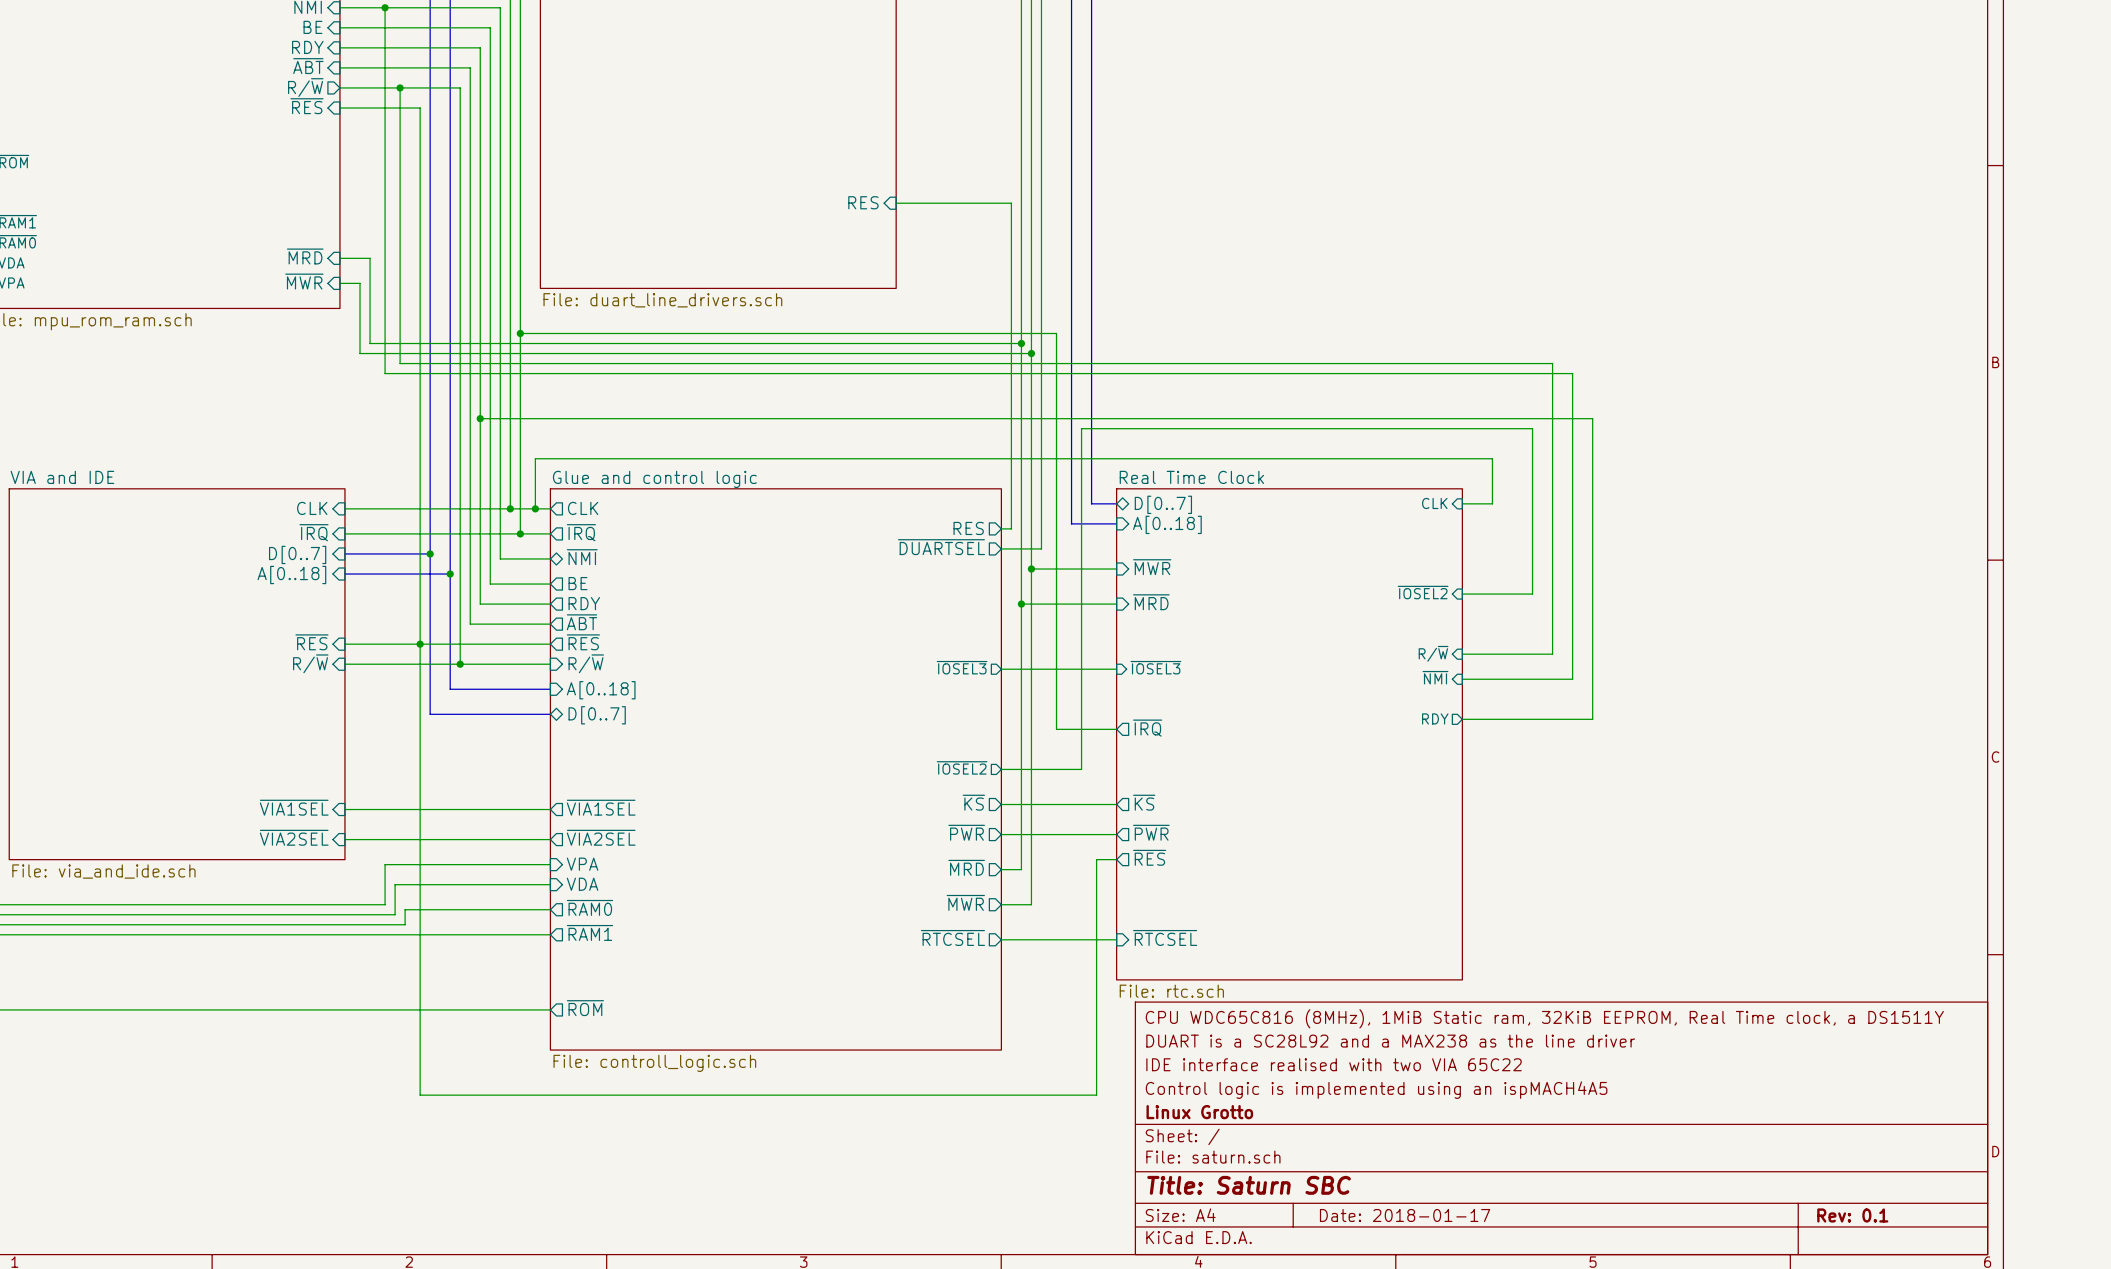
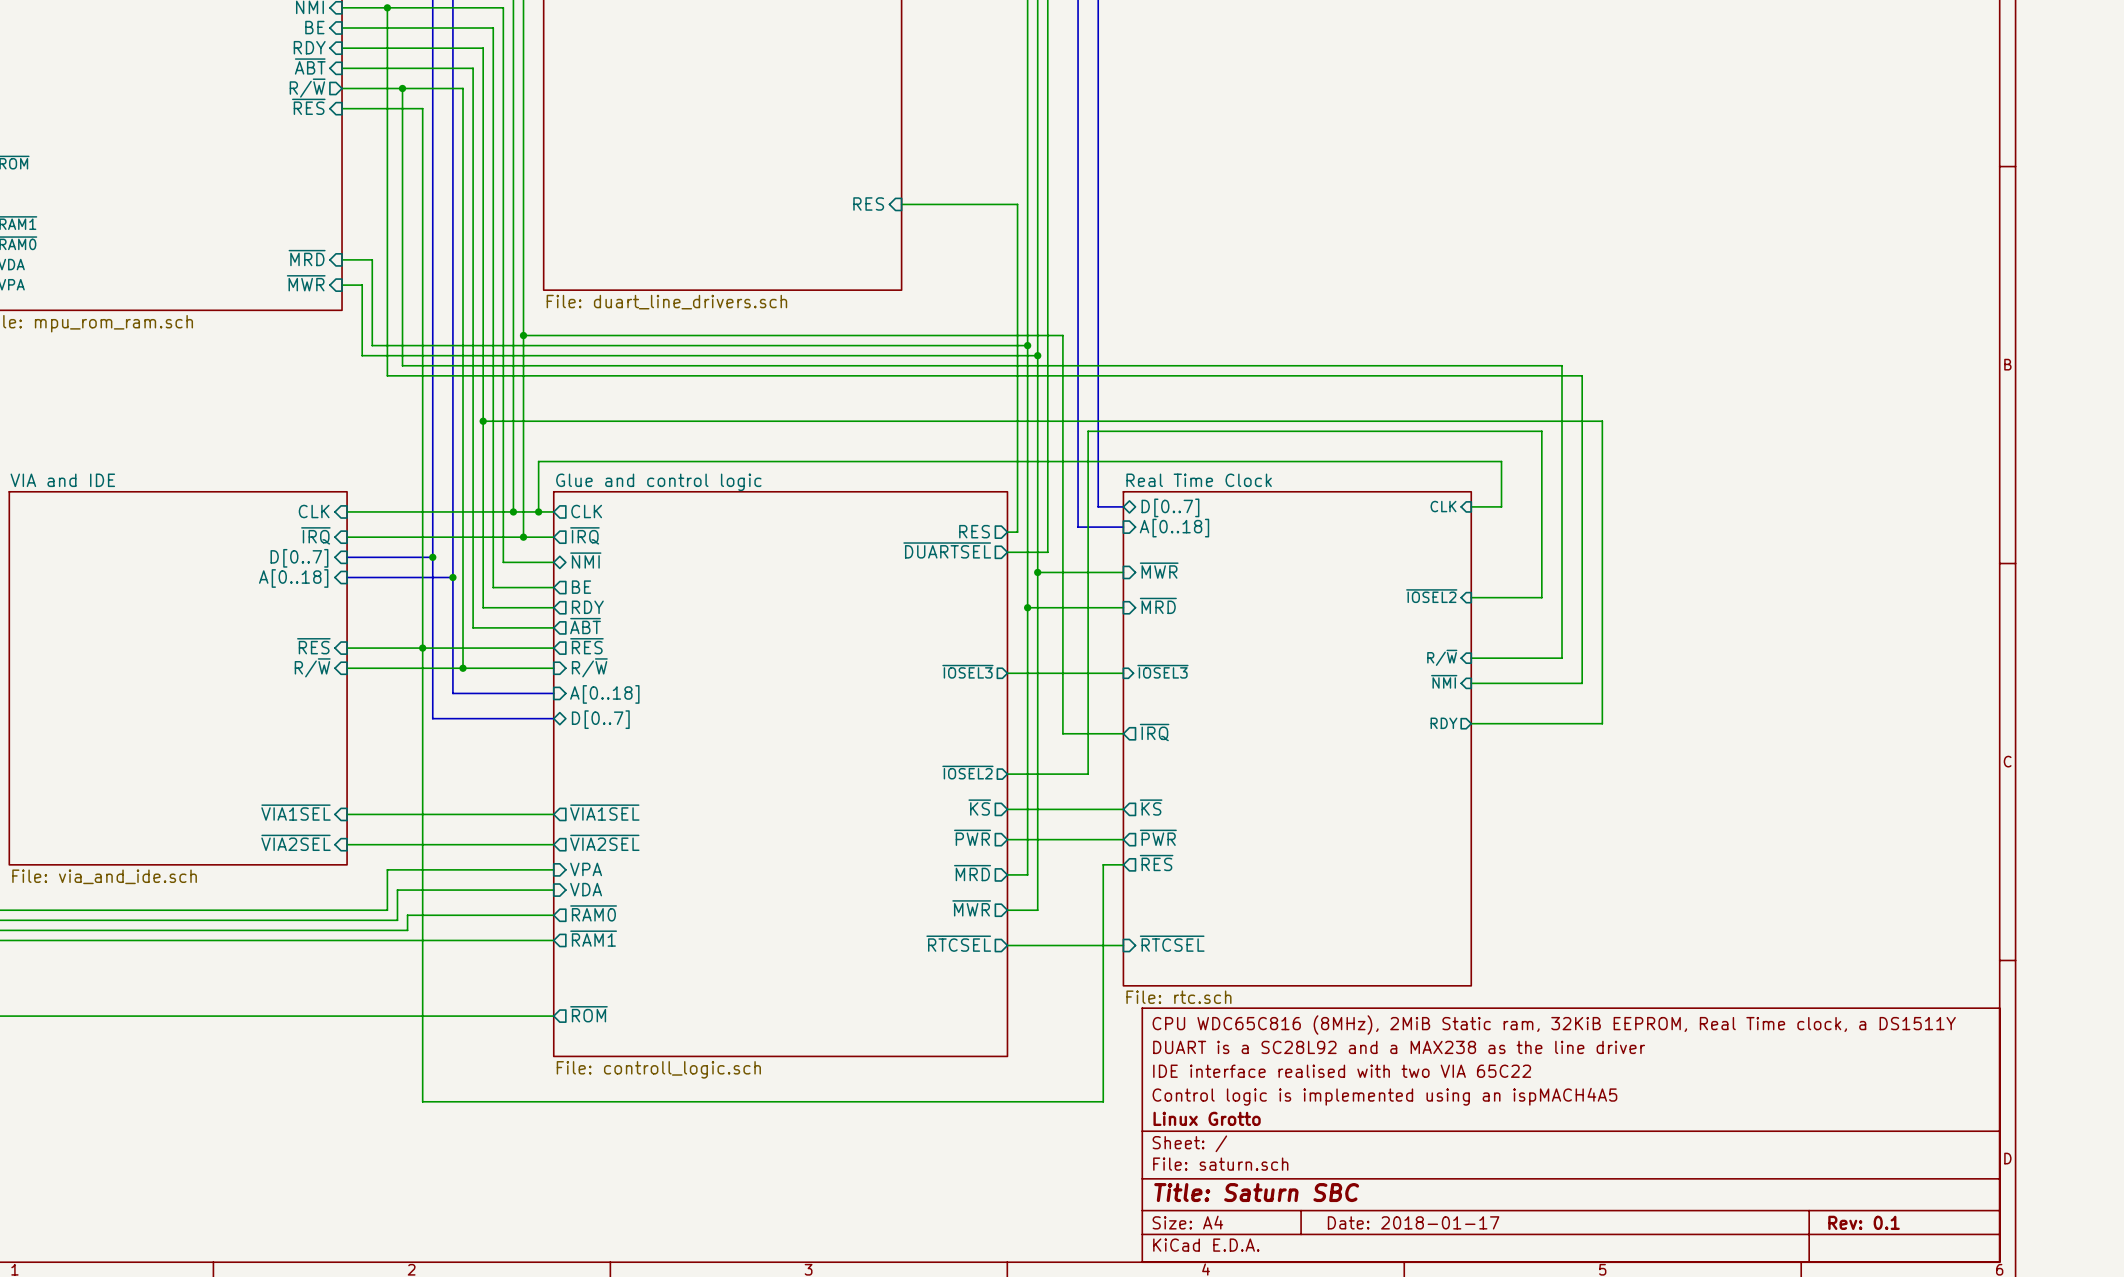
title block: CPU WDC65C816 (8MHz), 1MiB Static ram, 32KiB EEPROM, Real Time clock, a DS1511Y (1544, 1018) -> CPU WDC65C816 (8MHz), 2MiB Static ram, 32KiB EEPROM, Real Time clock, a DS1511Y (1554, 1025)

